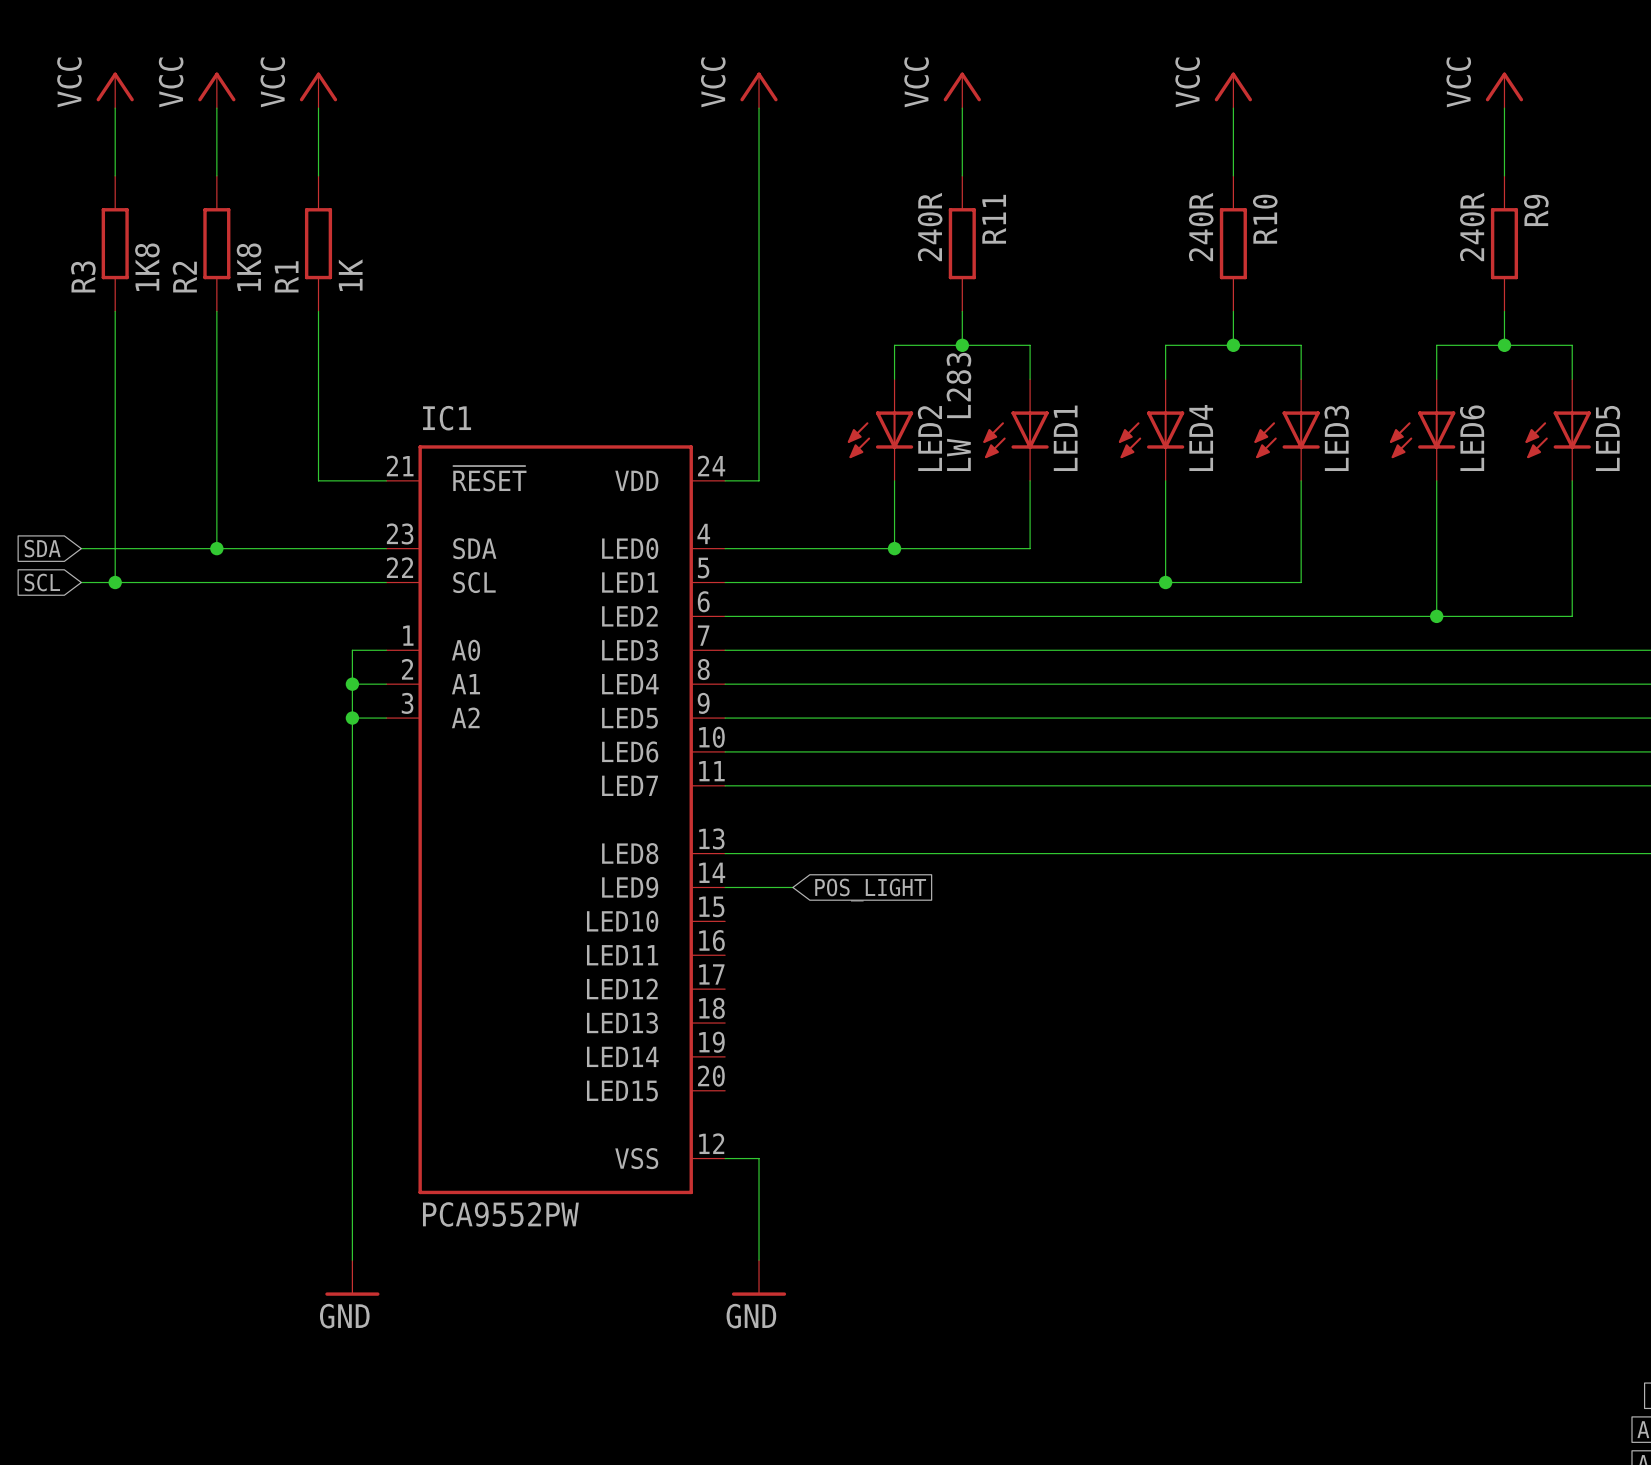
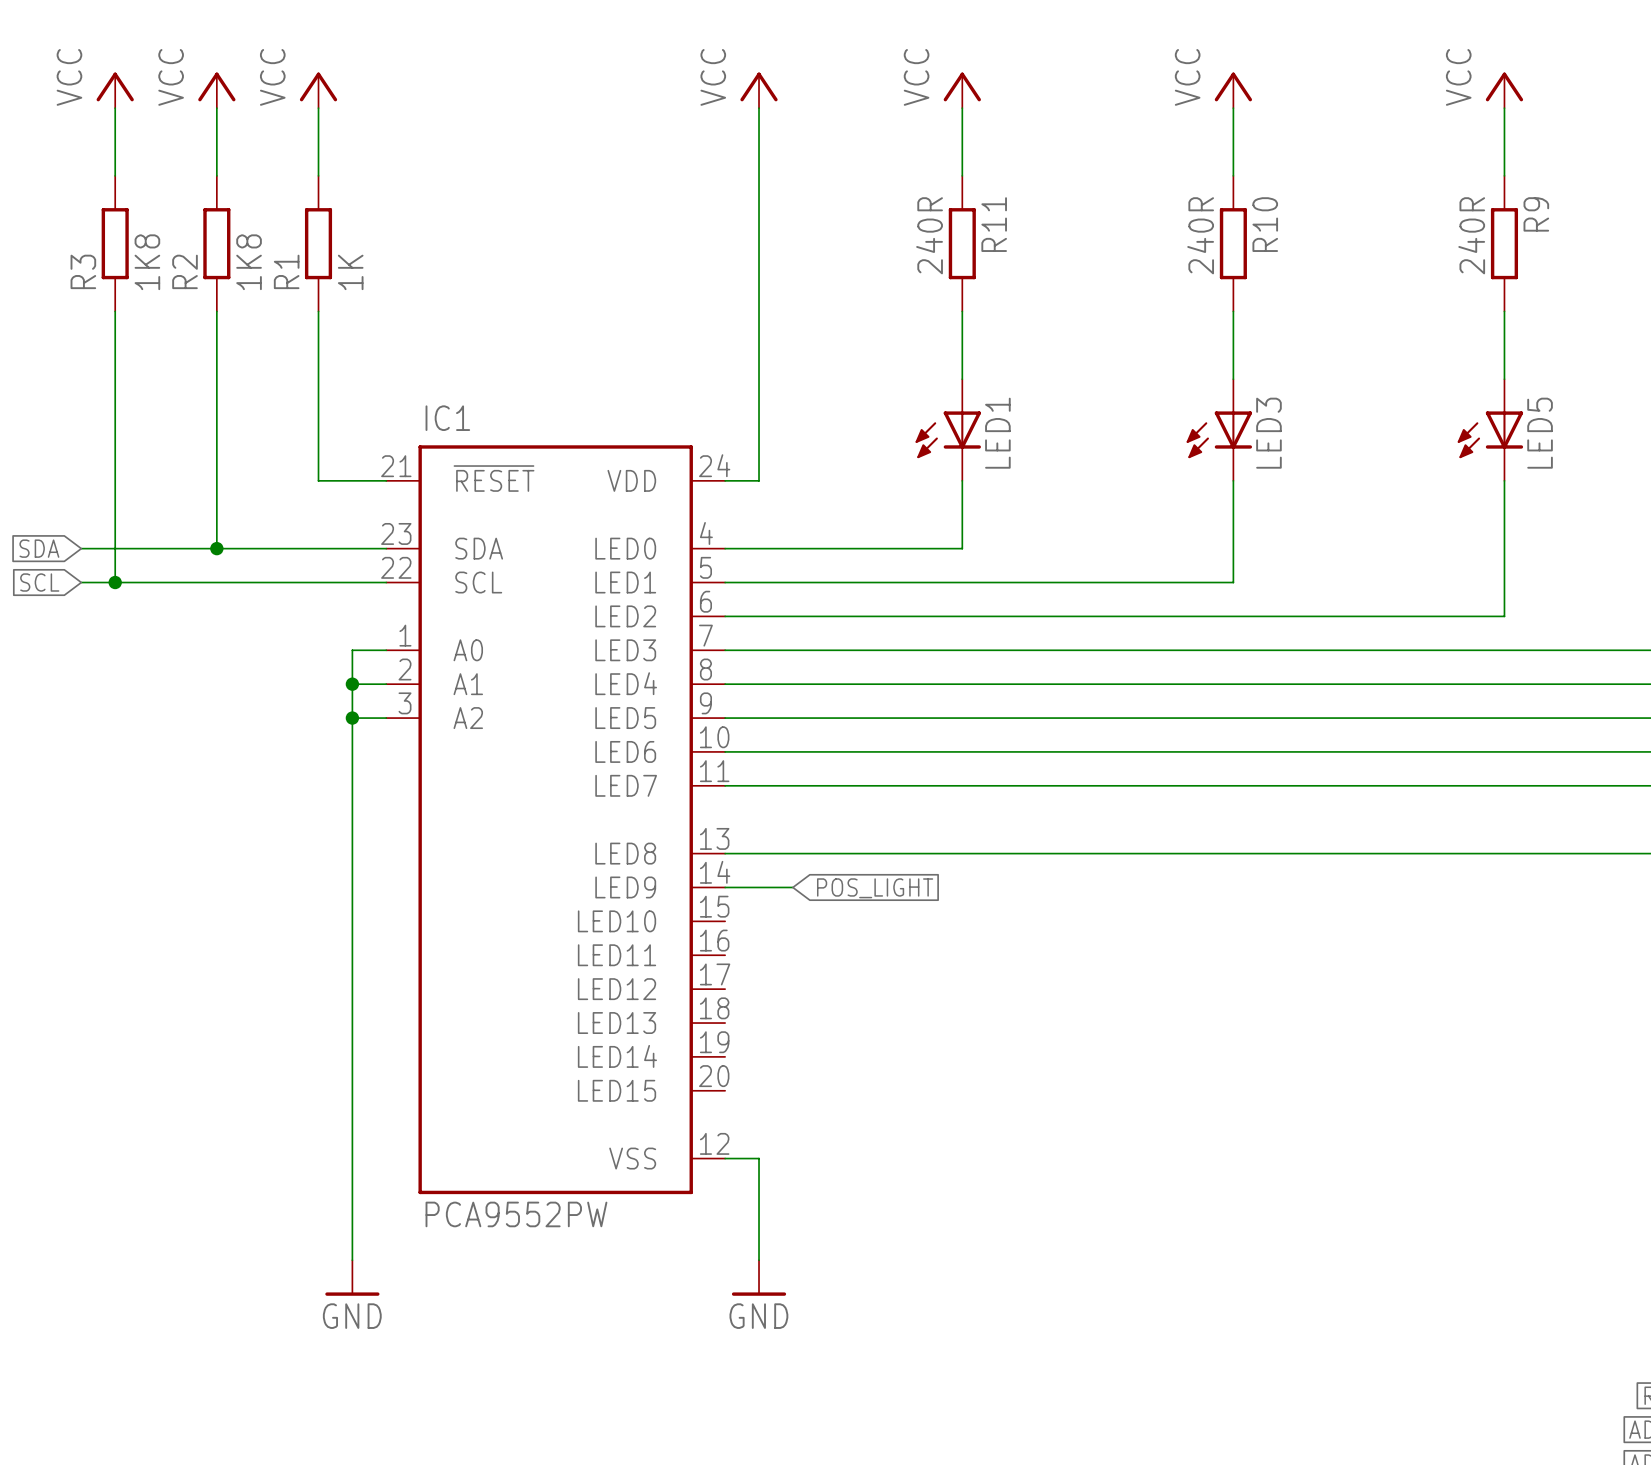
wire: none -> (962, 345) (962, 379)
junction: (962, 345) -> none
wire: none -> (1233, 345) (1233, 379)
junction: (1233, 345) -> none
wire: none -> (1504, 345) (1504, 379)
junction: (1504, 345) -> none
wire: (894, 379) (894, 345) (1030, 345) (1030, 379) -> none
wire: (1165, 379) (1165, 345) (1301, 345) (1301, 379) -> none
wire: (1436, 379) (1436, 345) (1572, 345) (1572, 379) -> none
LED2: LW L283 (880, 430) -> none
LED1 position: (1016, 430) -> (948, 430)
LED4: (1151, 430) -> none
LED3 position: (1287, 430) -> (1219, 430)
LED6: (1422, 430) -> none
LED5 position: (1558, 430) -> (1490, 430)
wire: (894, 480) (894, 548) -> none
wire: (1030, 480) (1030, 548) (962, 548) -> (962, 480) (962, 548)
wire: (1165, 480) (1165, 582) -> none
wire: (1301, 480) (1301, 582) (1233, 582) -> (1233, 480) (1233, 582)
wire: (1436, 480) (1436, 616) -> none
wire: (1572, 480) (1572, 616) (1504, 616) -> (1504, 480) (1504, 616)
junction: (894, 548) -> none
junction: (1165, 582) -> none
junction: (1436, 616) -> none

